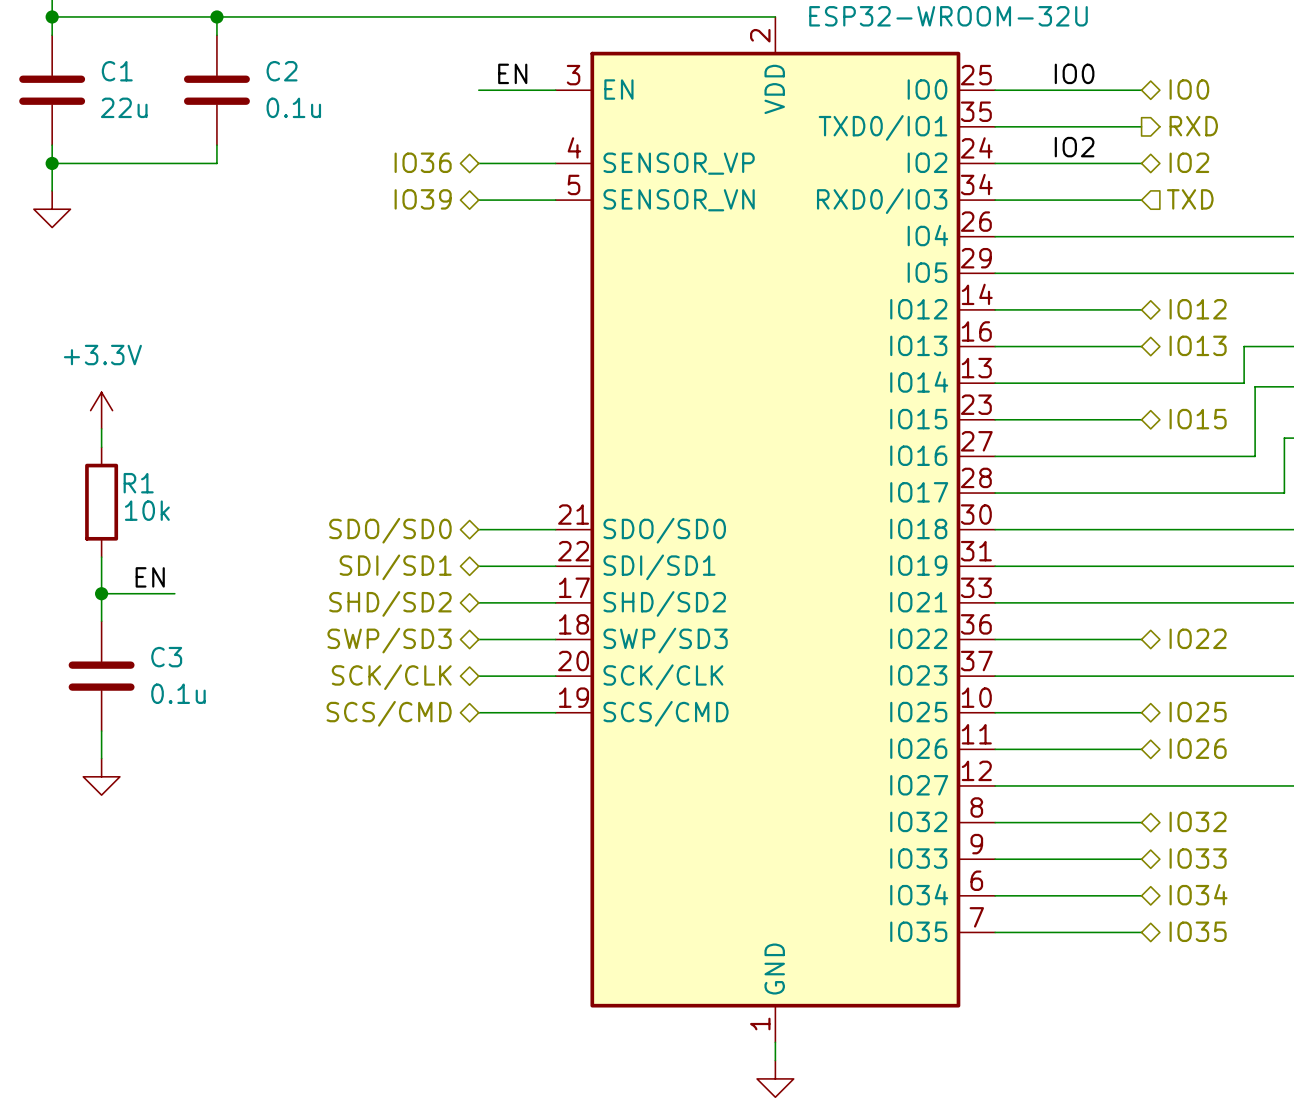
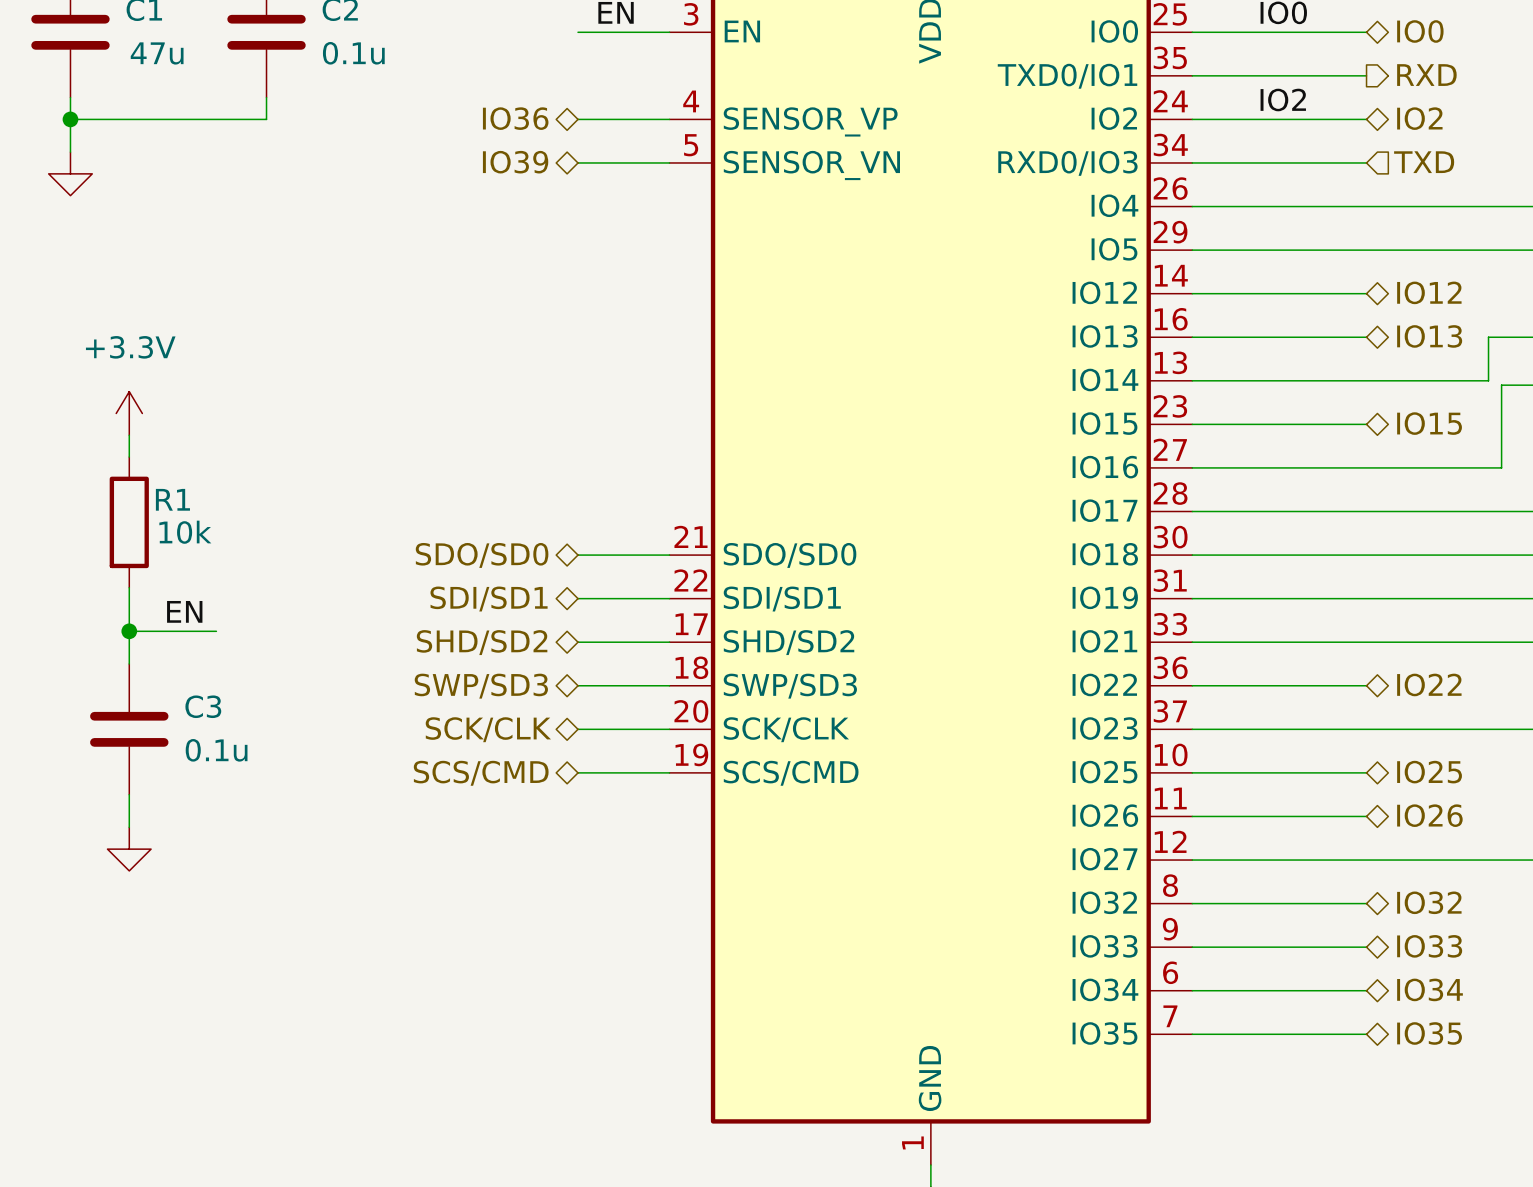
C1 value: 22u (124, 107) -> 47u (157, 53)

